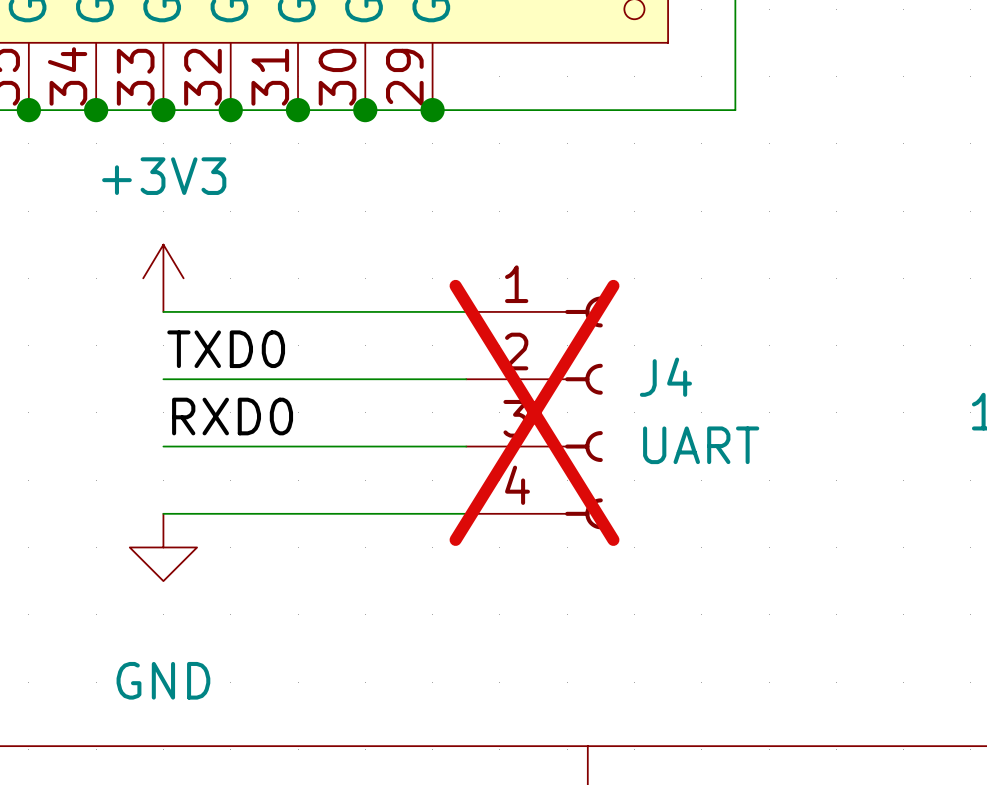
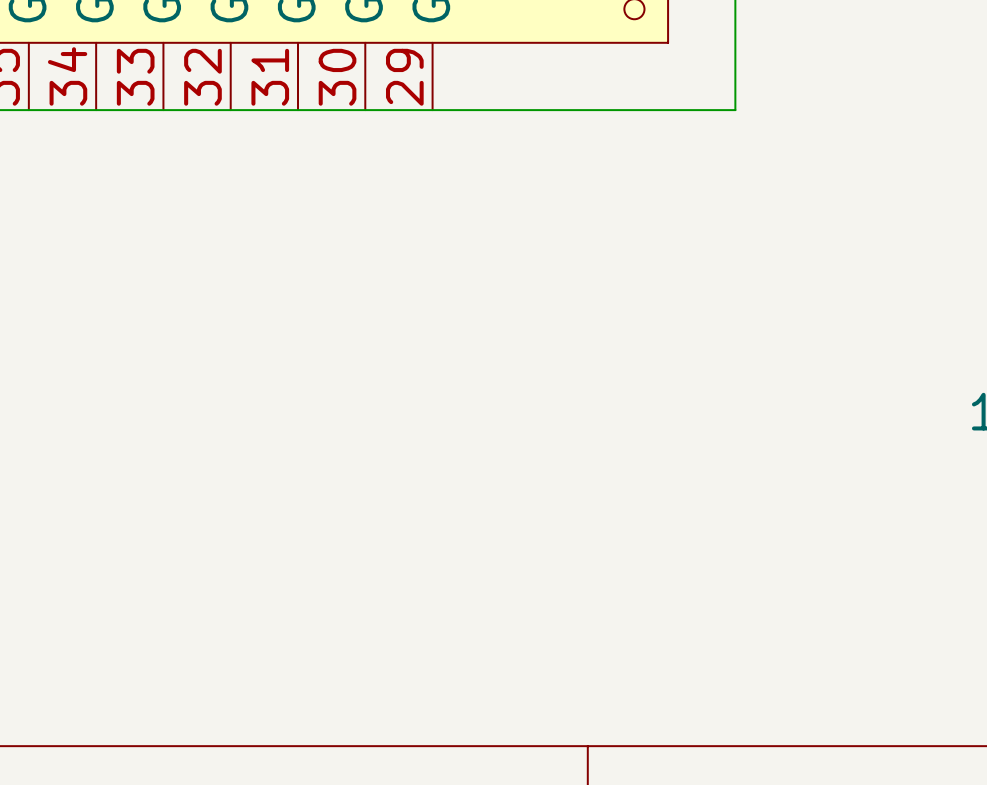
junction: (28, 110) -> none
junction: (96, 110) -> none
junction: (163, 110) -> none
junction: (230, 110) -> none
junction: (298, 110) -> none
junction: (365, 110) -> none
junction: (432, 110) -> none
power symbol: +3V3 (163, 278) -> none
wire: (163, 311) (466, 311) -> none
label: TXD0 (226, 349) -> none
wire: (163, 379) (466, 379) -> none
J4: UART (534, 412) -> none
label: RXD0 (232, 416) -> none
wire: (163, 446) (466, 446) -> none
wire: (163, 513) (466, 513) -> none
power symbol: GND (163, 547) -> none

